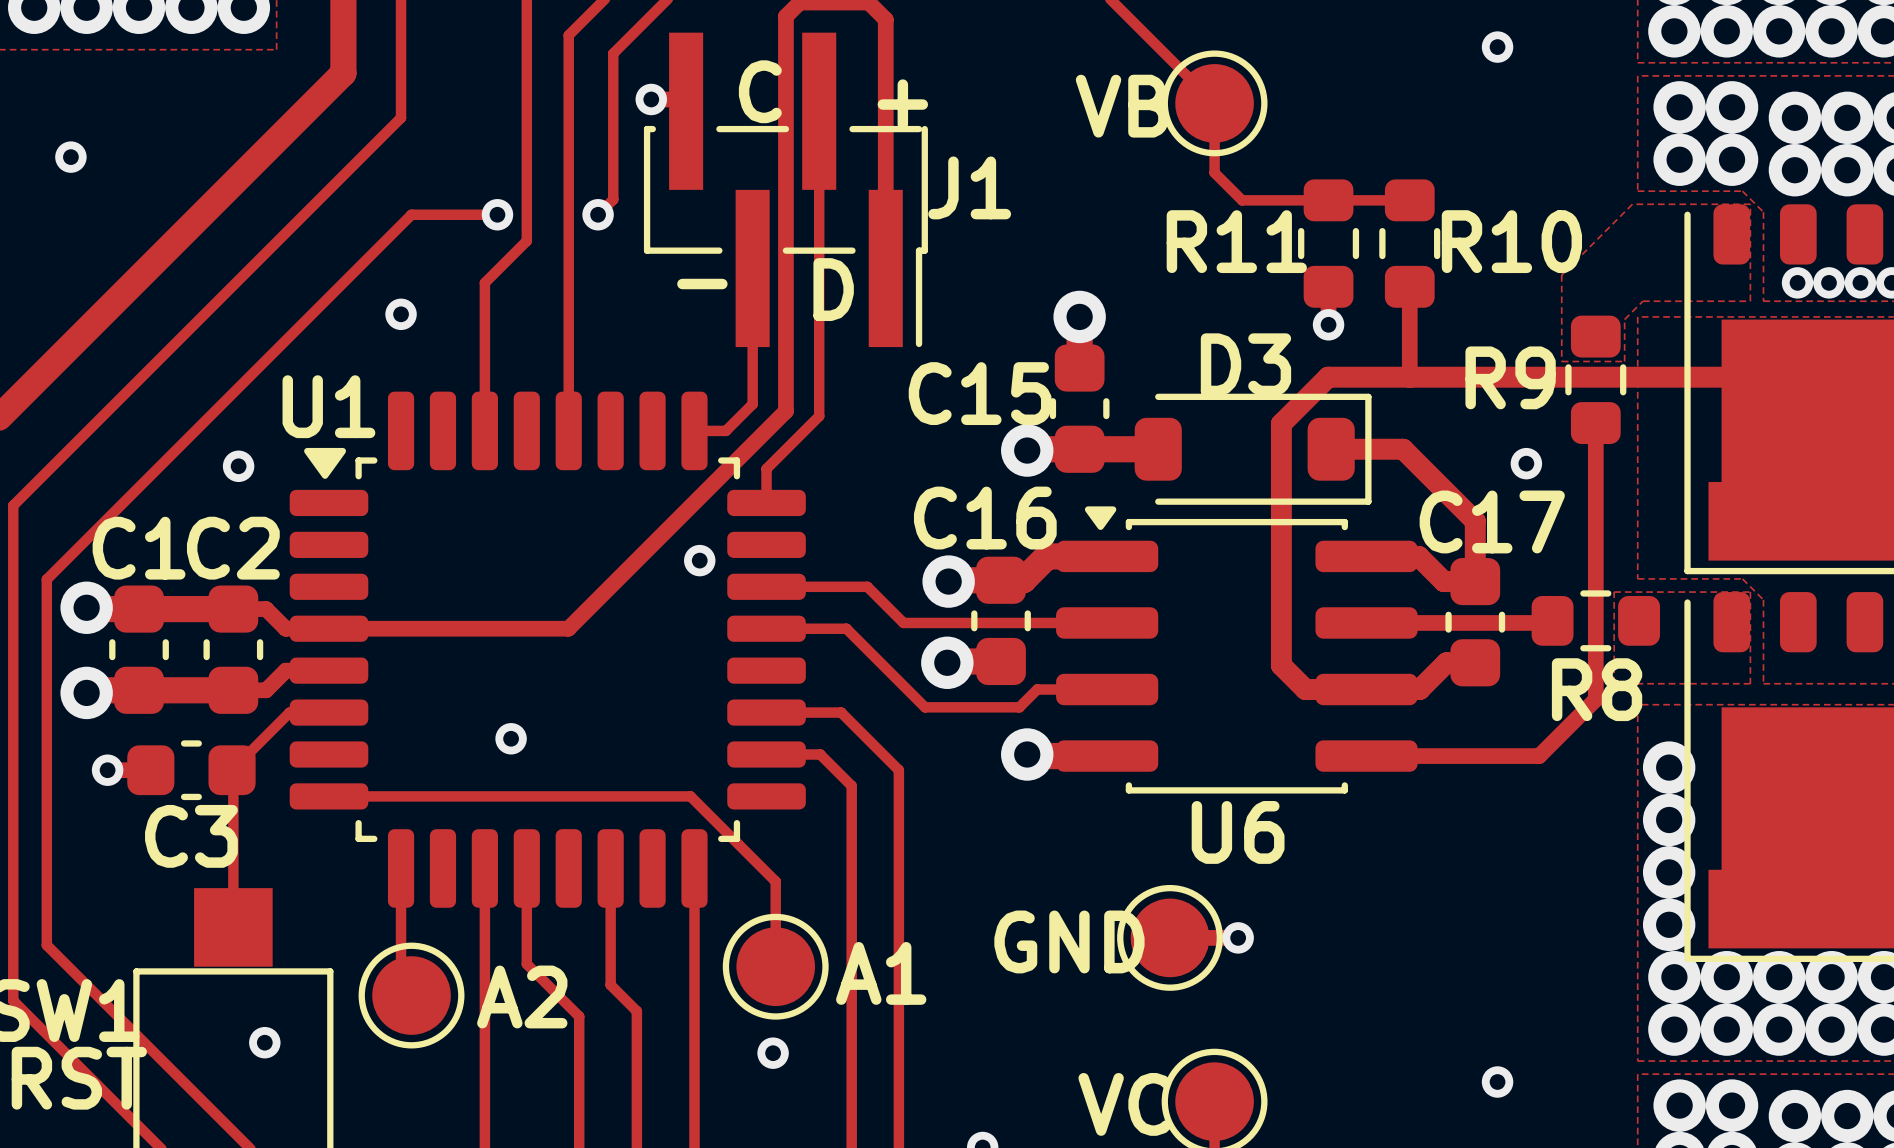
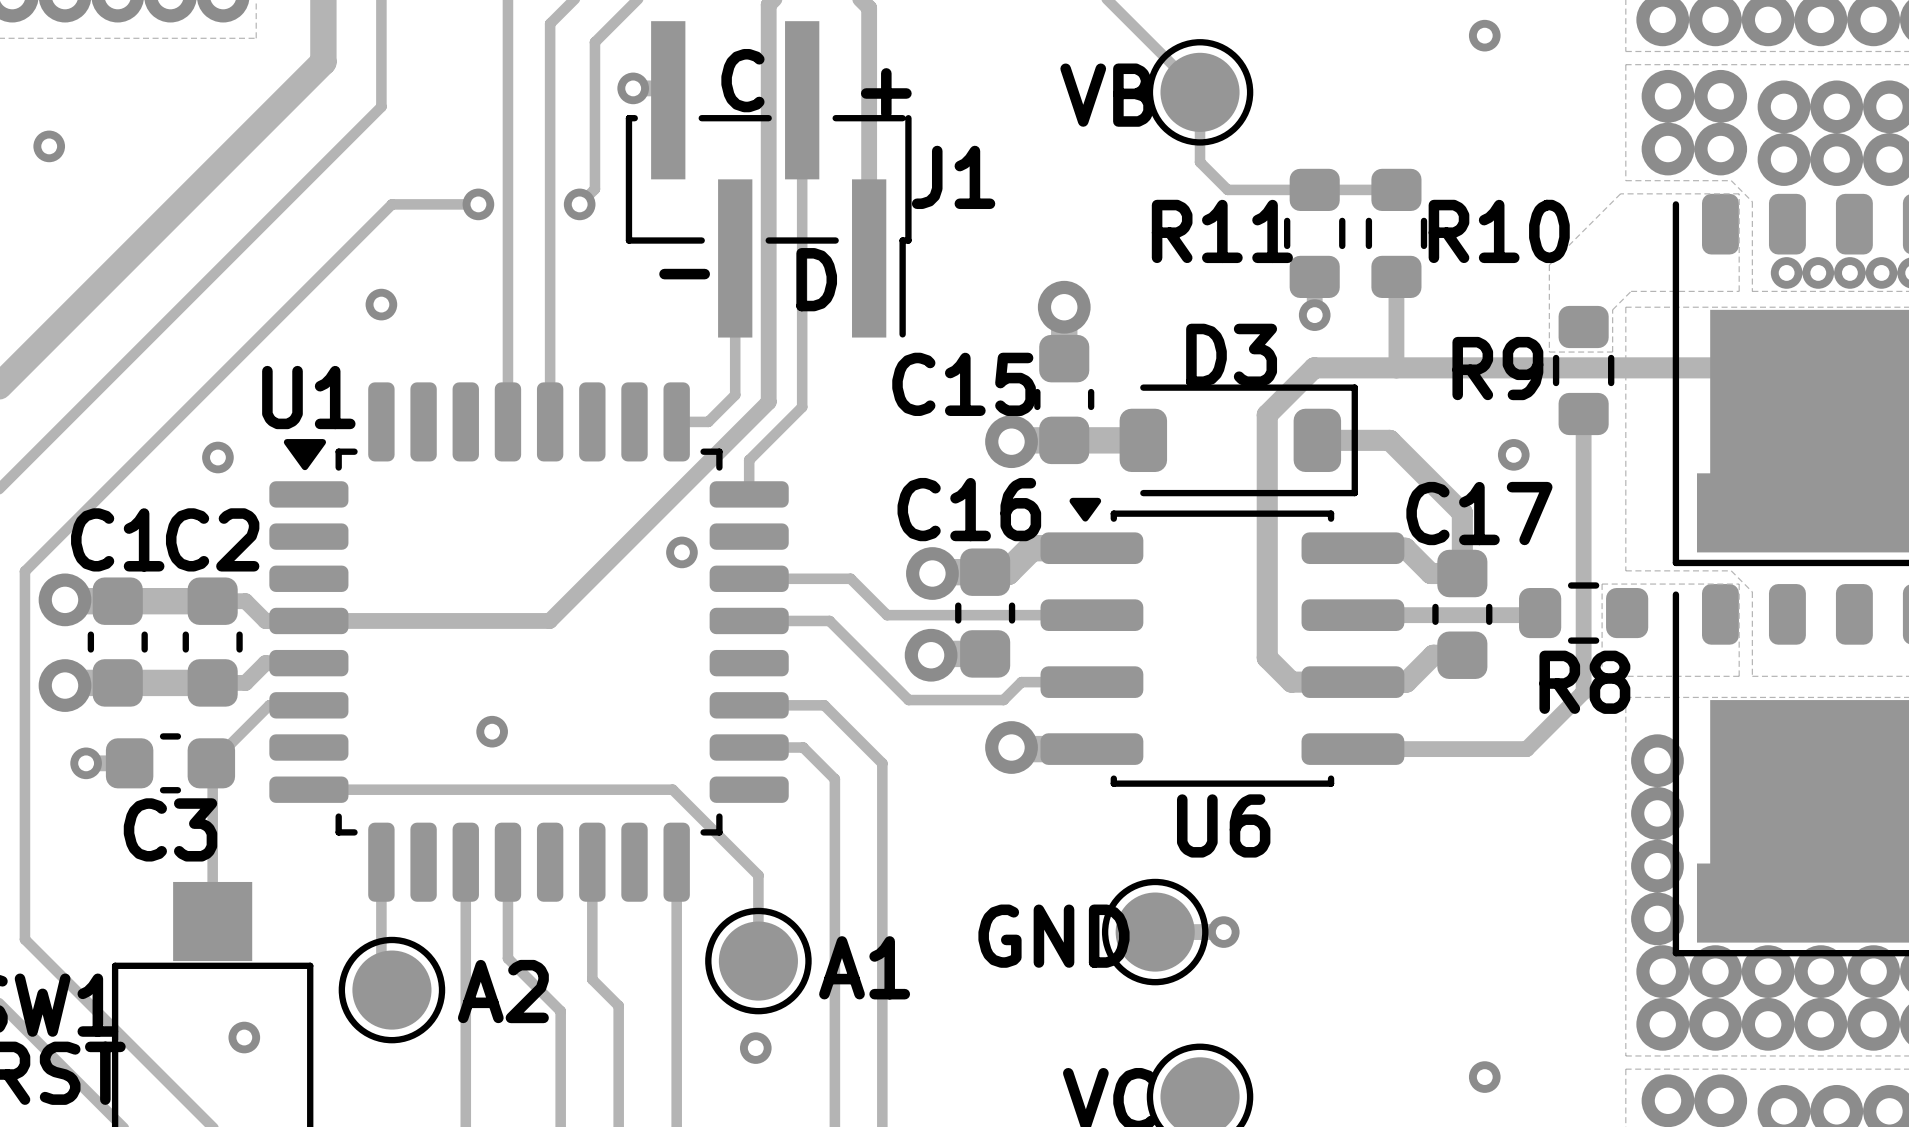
track: (526, 240) (484, 282) (484, 430) -> (507, 230) (507, 421)

